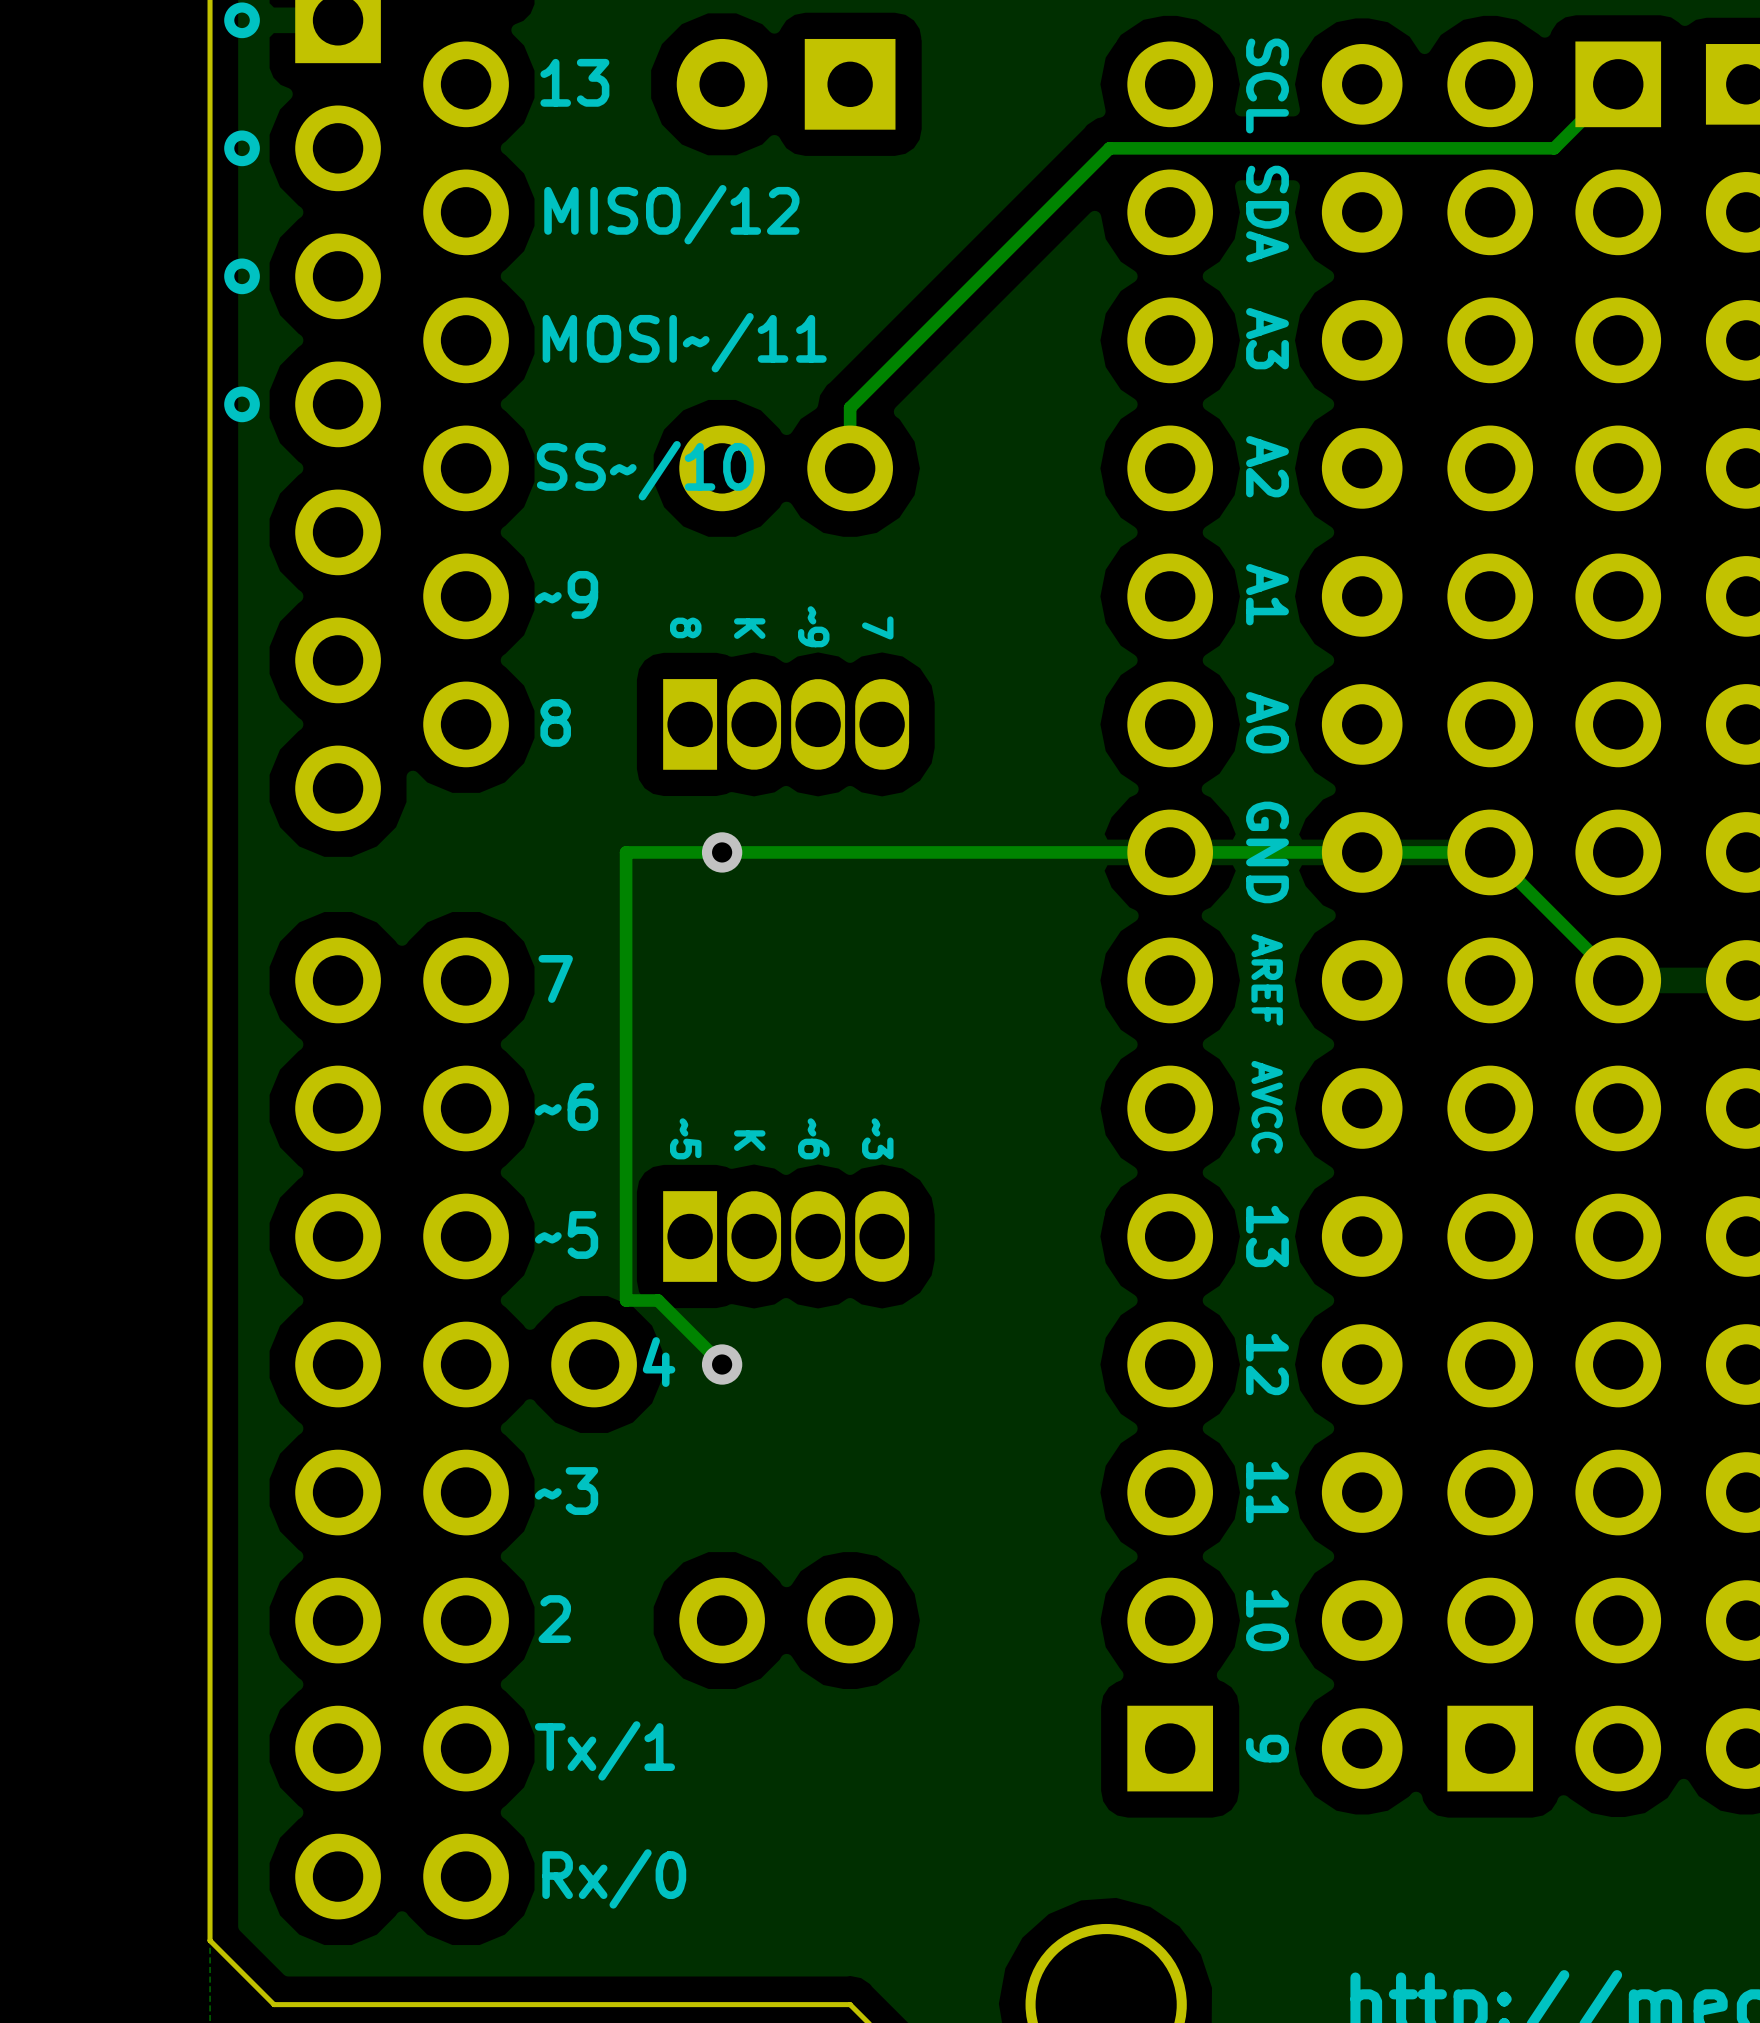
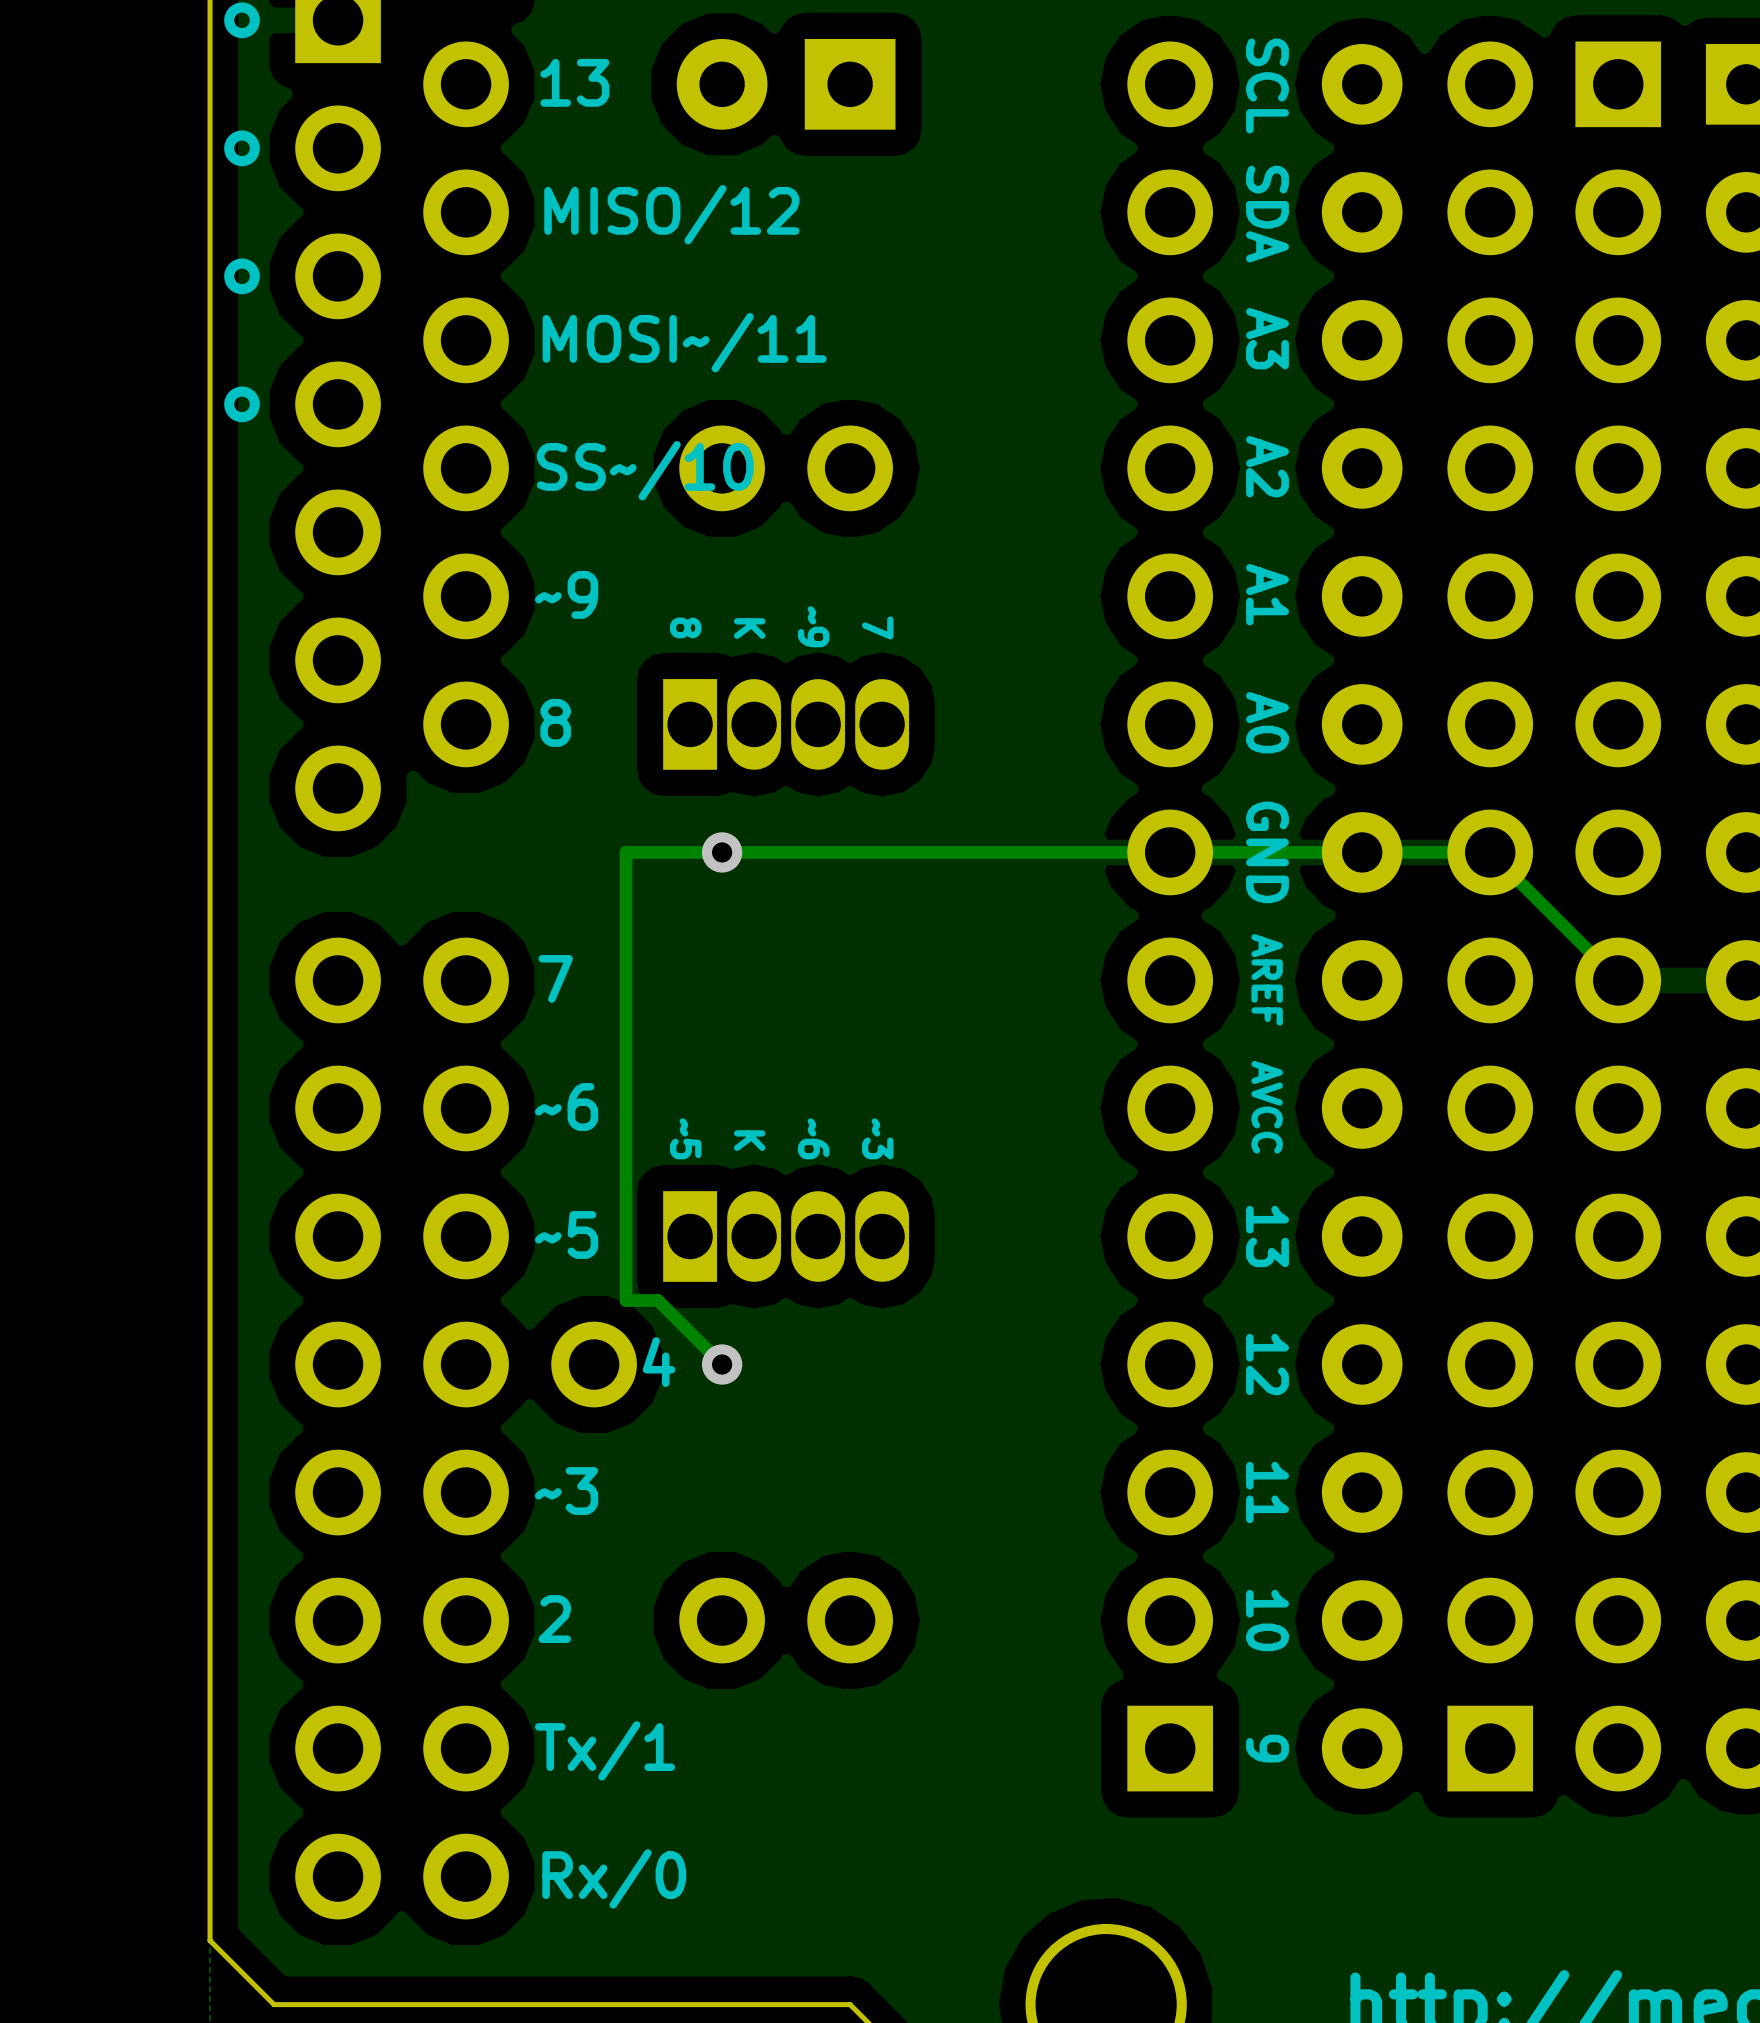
track: (1618, 84) (1554, 148) (1109, 148) (850, 407) (850, 468) -> none

